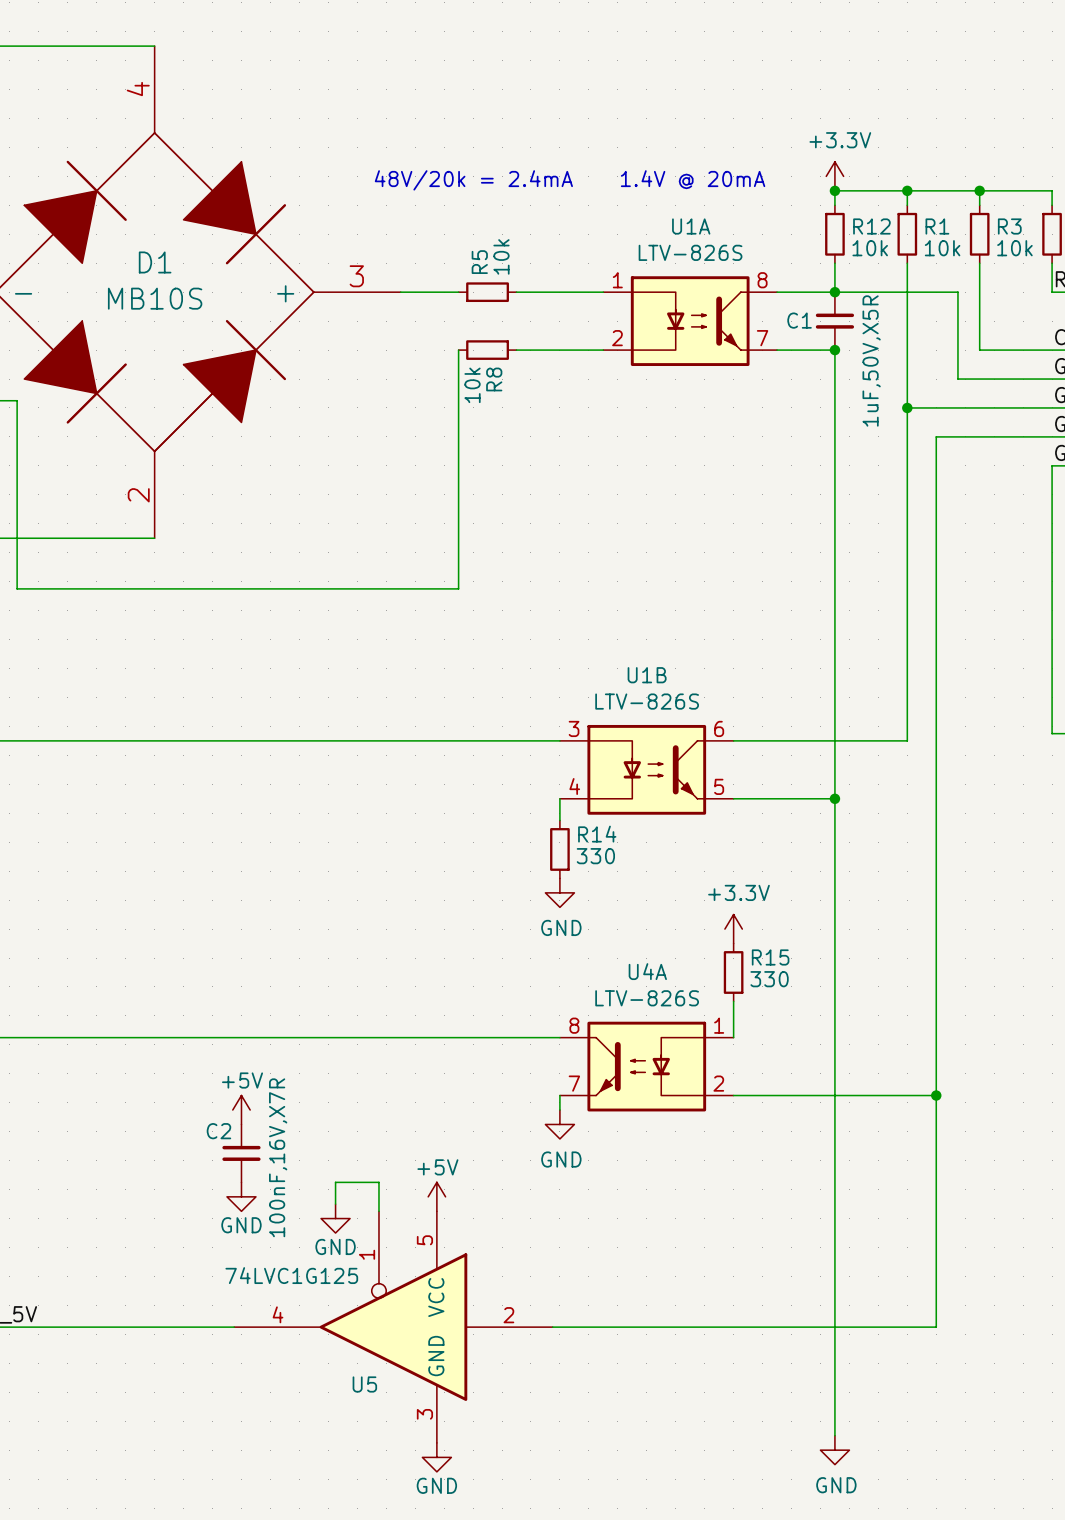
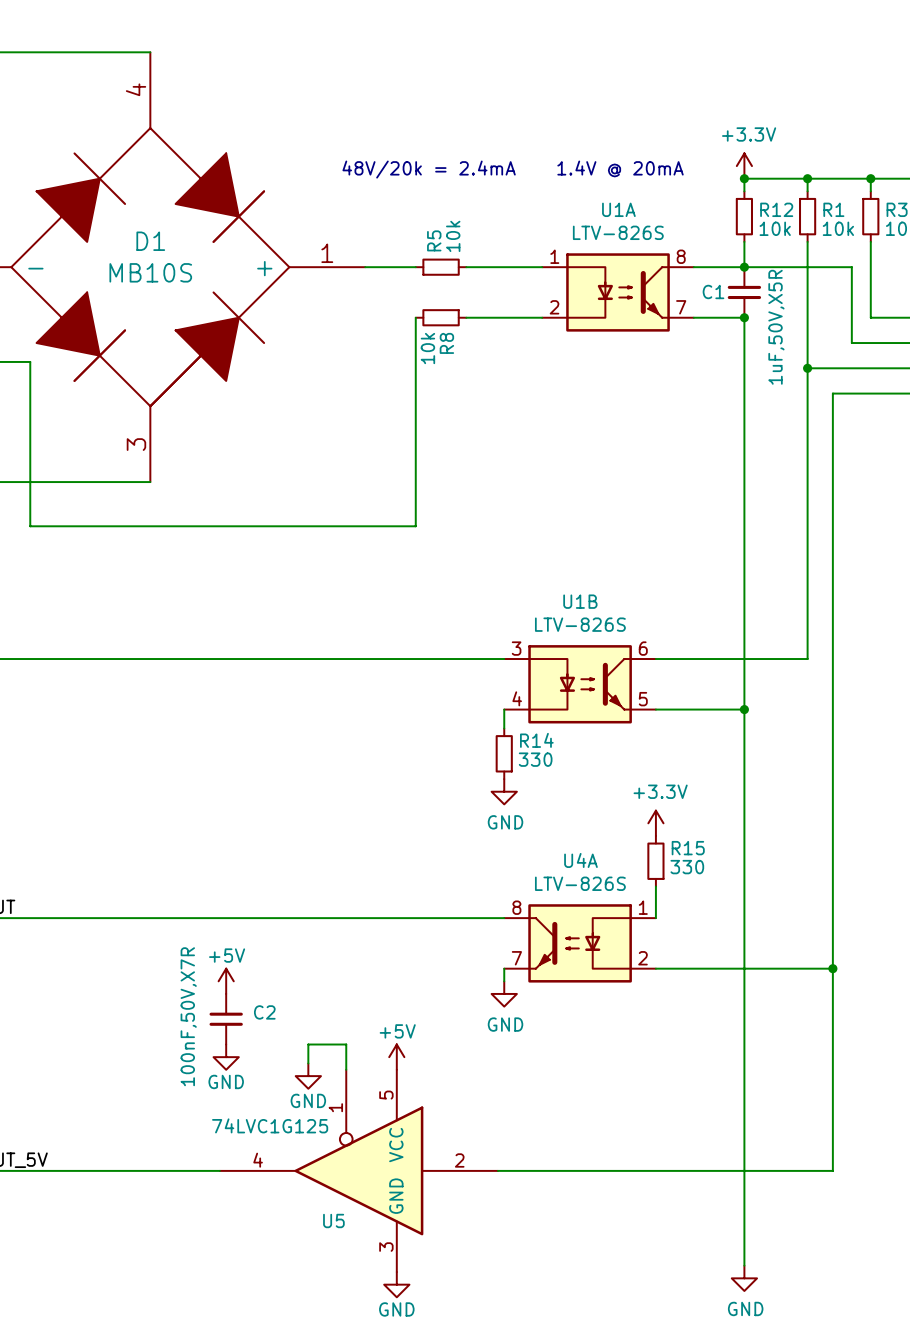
D1 pin number: 3 (356, 276) -> 1 (327, 253)
D1 pin number: 2 (138, 495) -> 3 (136, 444)
C2 name position: C2 (218, 1131) -> C2 (264, 1012)
C2 value: 100nF,16V,X7R (278, 1157) -> 100nF,50V,X7R (188, 1016)

